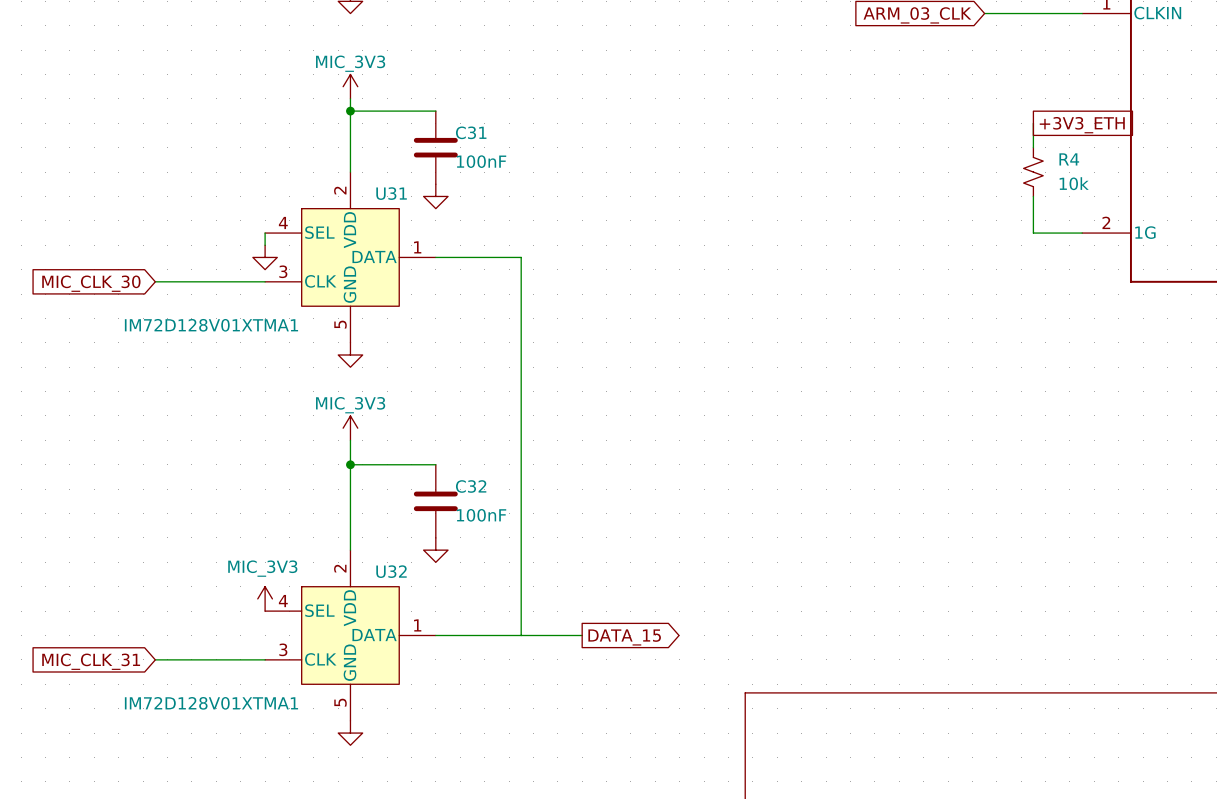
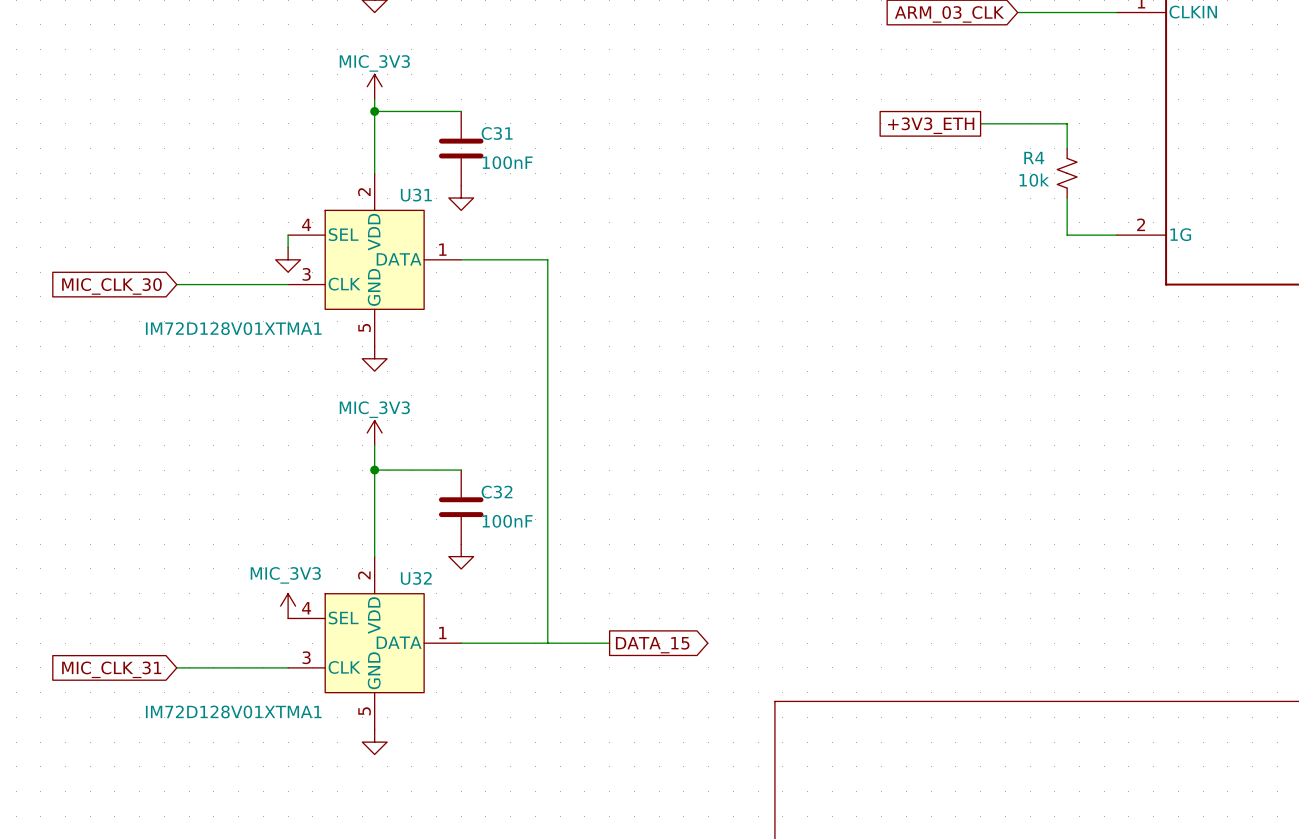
wire: none -> (980, 123) (1067, 123)
global label rotation: 0° (1082, 125) -> 180° (931, 125)
global label position: +3V3_ETH (1082, 125) -> +3V3_ETH (931, 125)
R4 name position: R4 (1069, 159) -> R4 (1034, 157)
R4 value position: 10k (1074, 183) -> 10k (1034, 180)

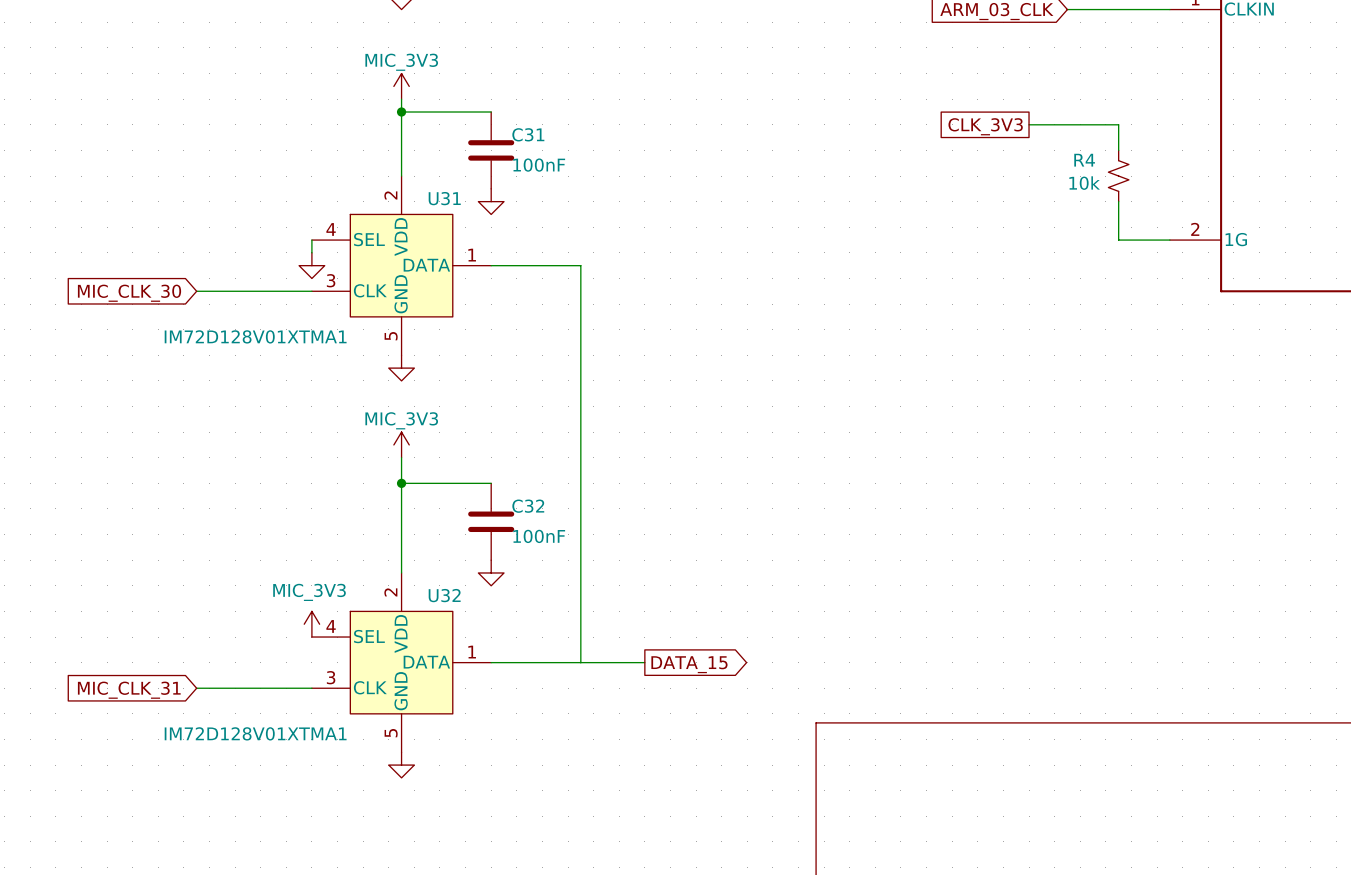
global label: +3V3_ETH (931, 125) -> CLK_3V3 (985, 126)

